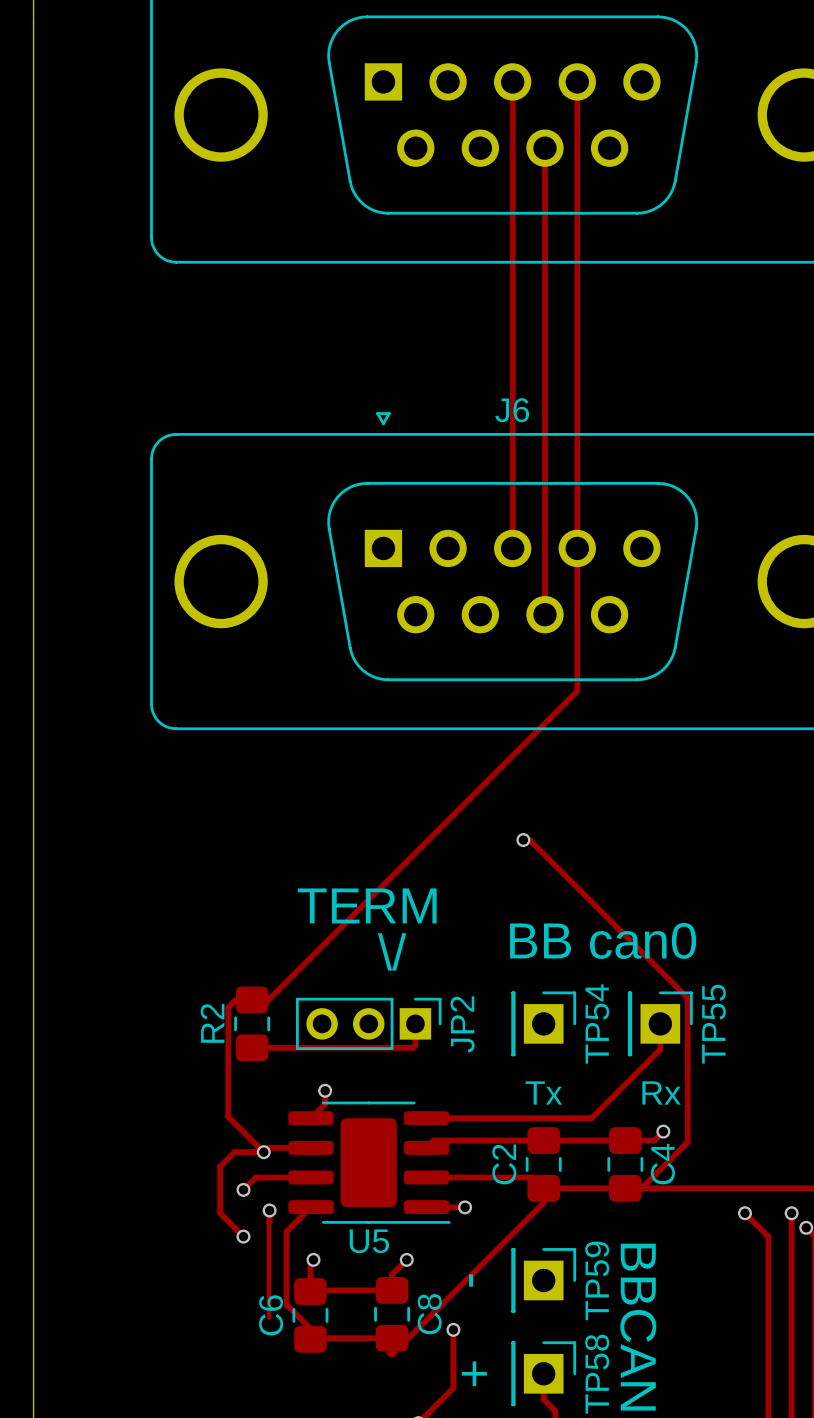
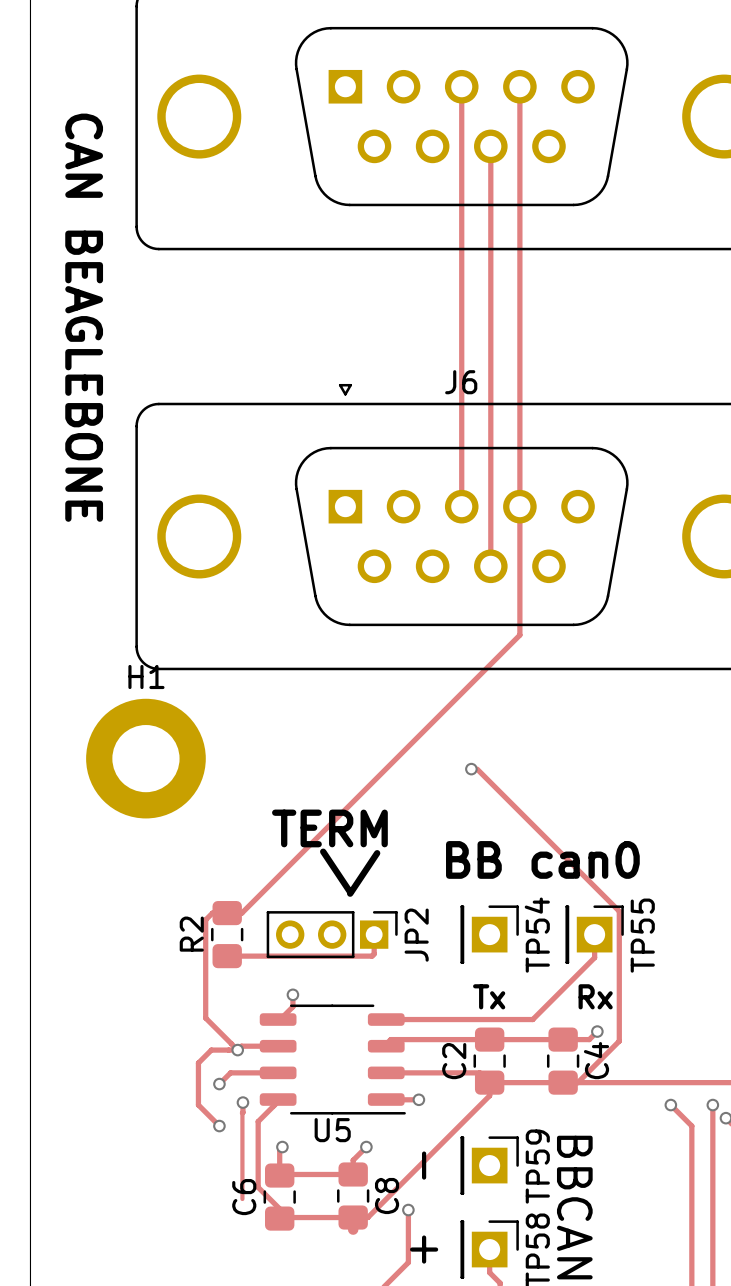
text: none -> CAN BEAGLEBONE (84, 317)
H1: none -> (145, 758)
U5 footprint: [288, 1101, 451, 1224] -> [259, 1004, 406, 1115]

